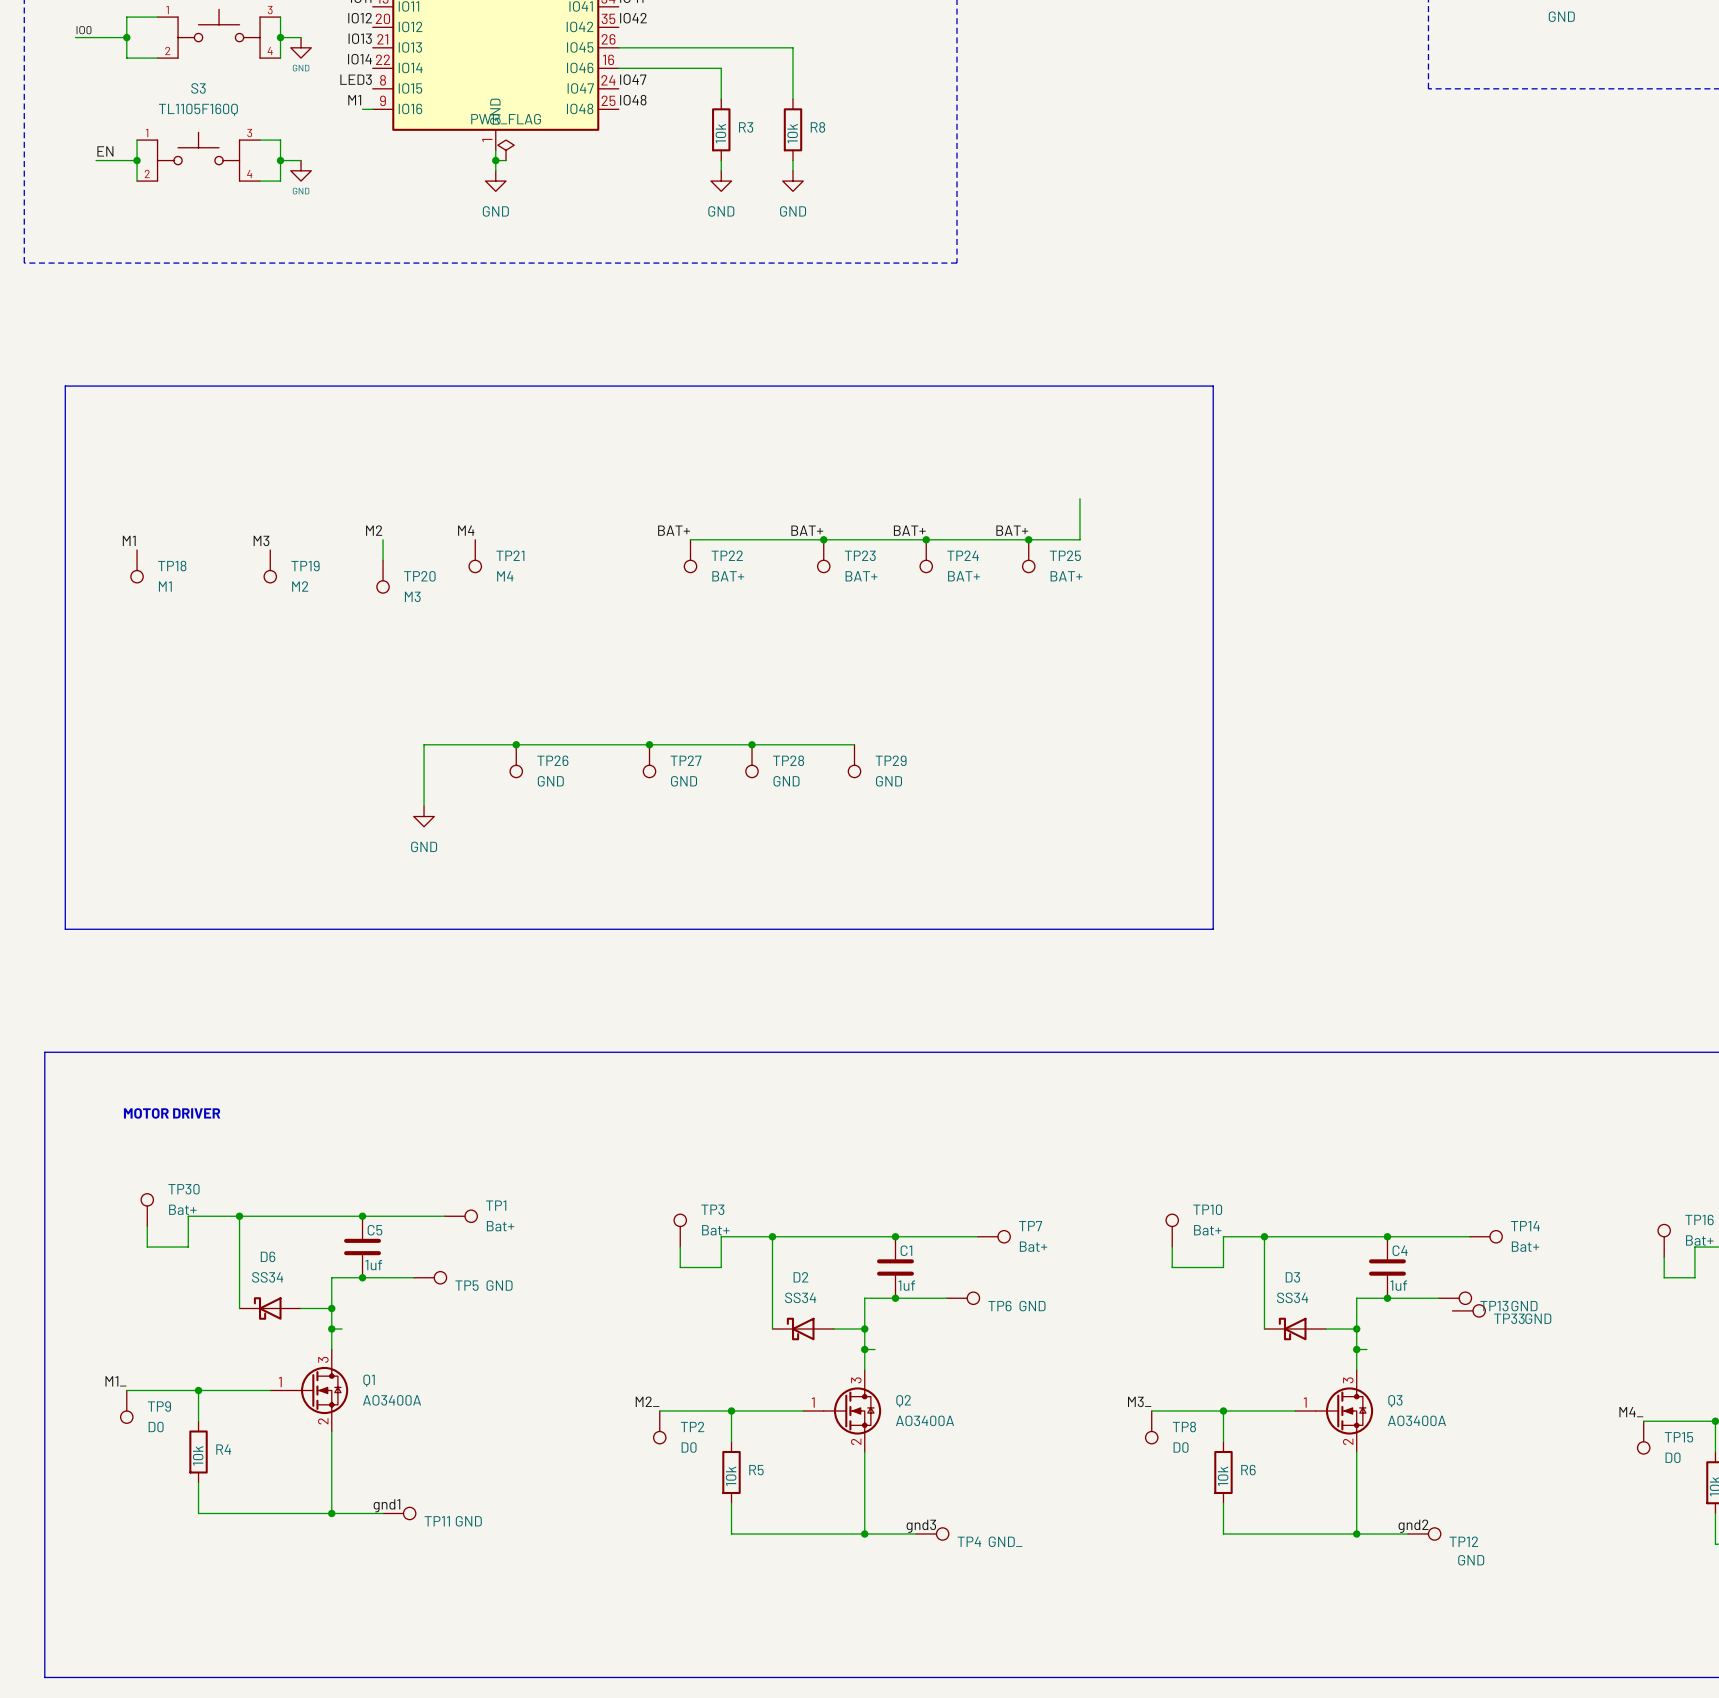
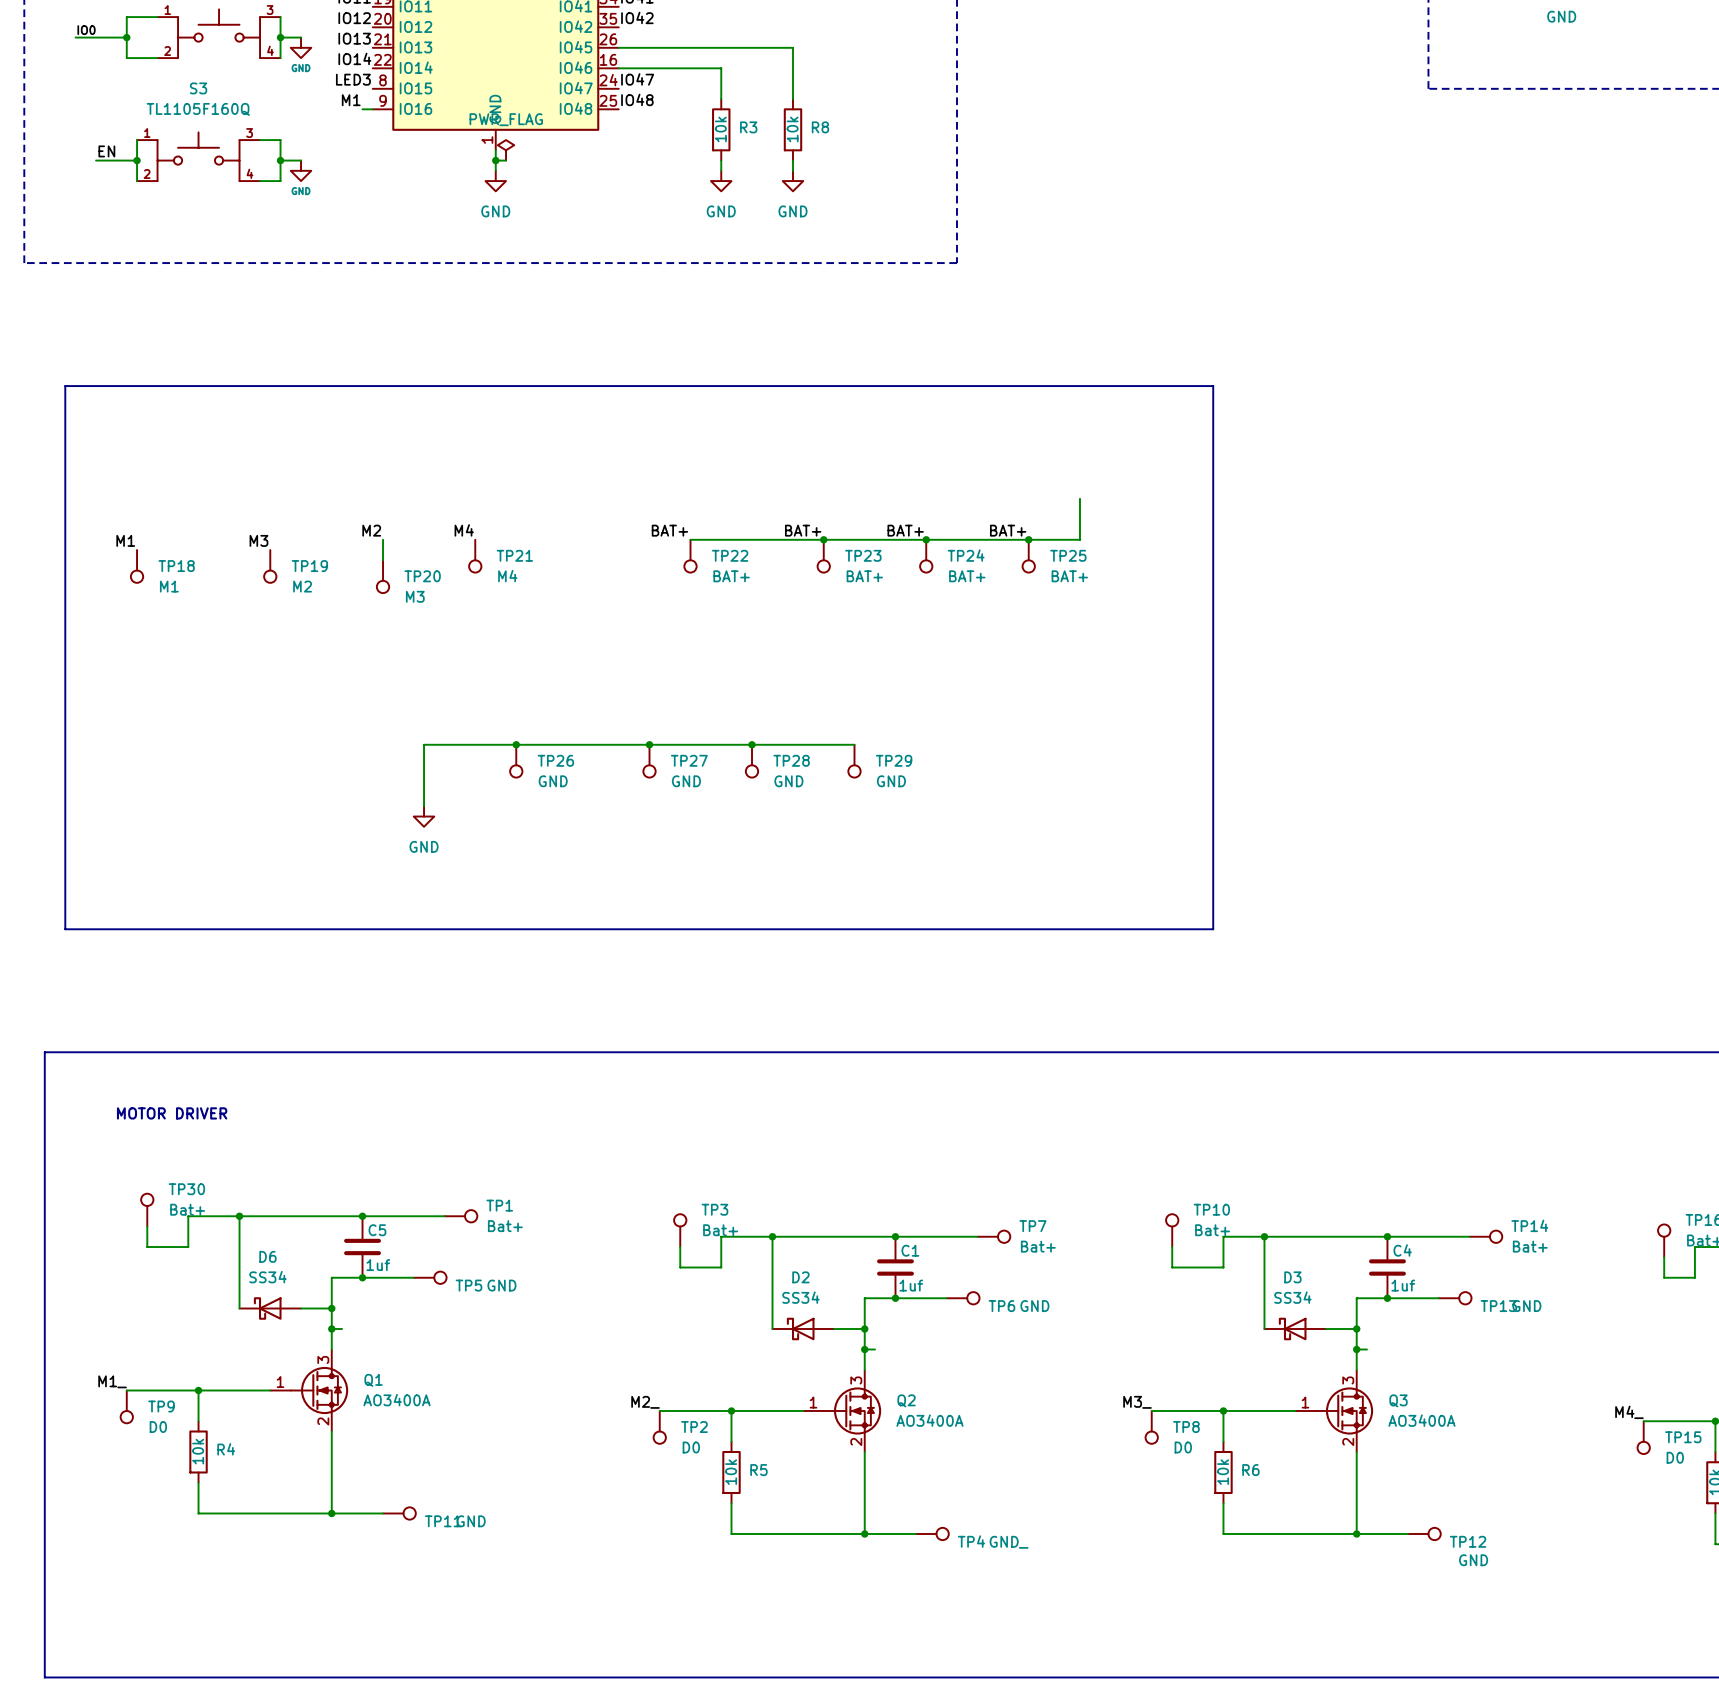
TP33: GND (1468, 1310) -> none
label: gnd1 (386, 1505) -> none
label: gnd3 (921, 1526) -> none
label: gnd2 (1413, 1526) -> none

